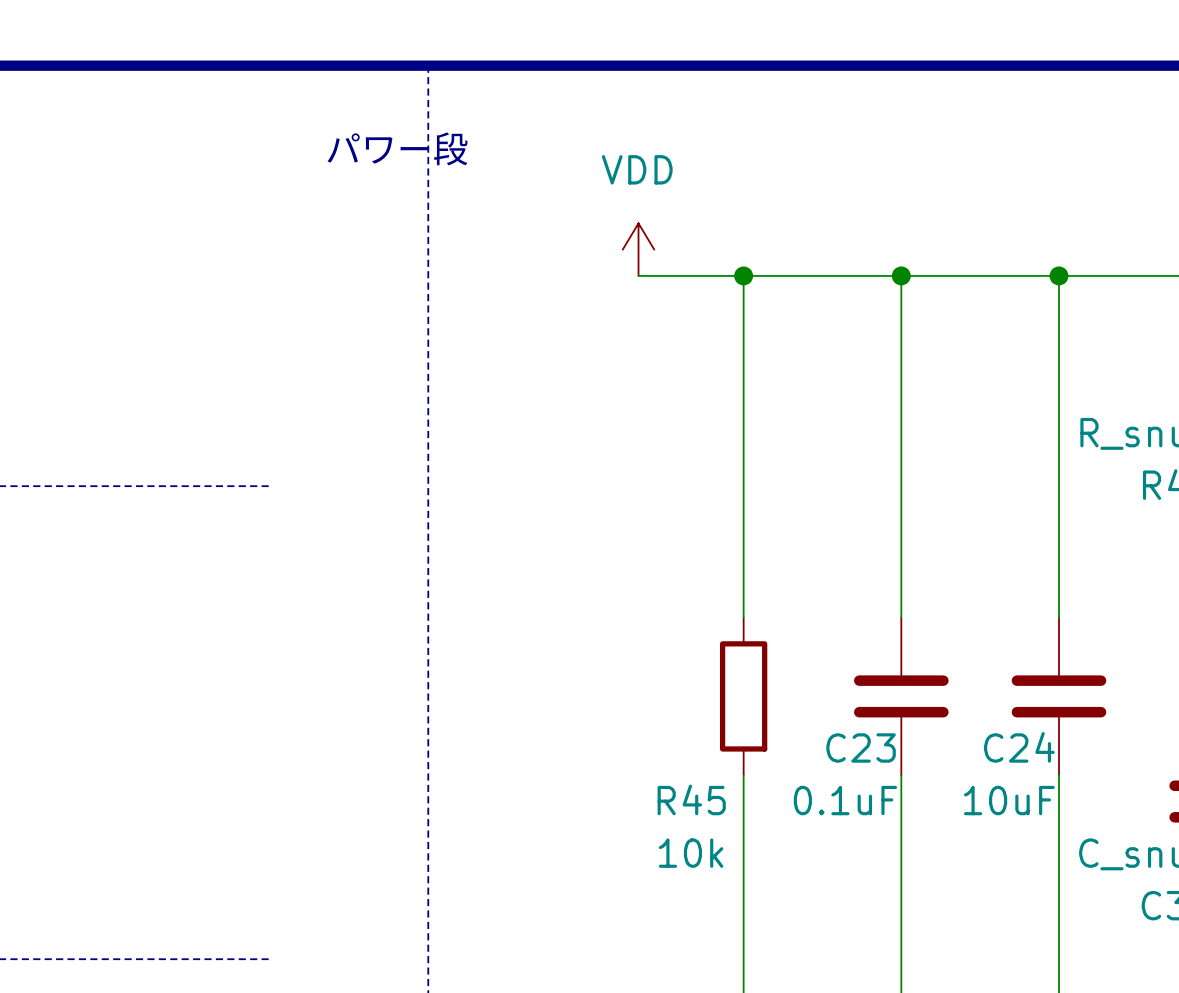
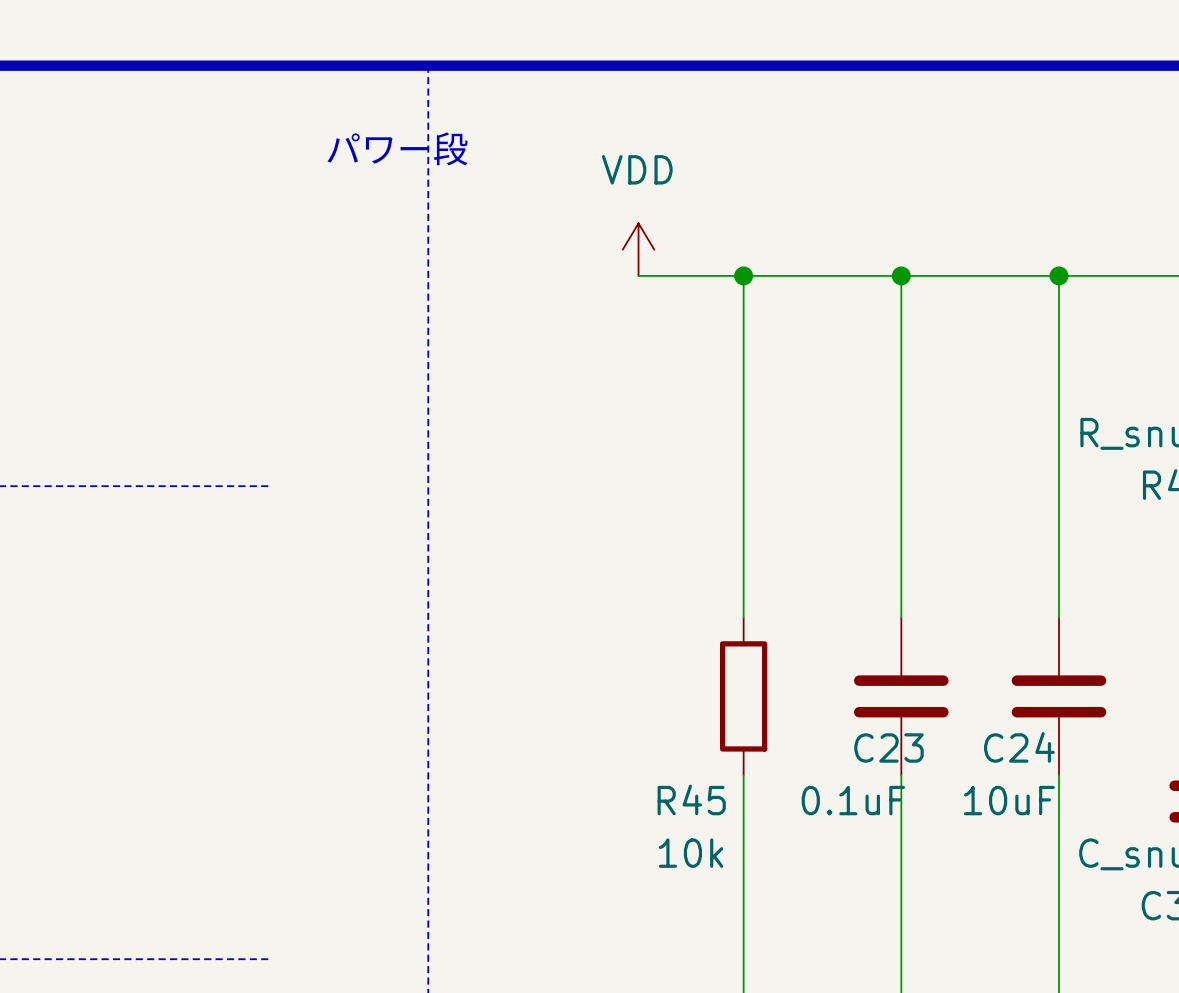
C23 name position: C23 (861, 747) -> C23 (889, 747)
C23 value position: 0.1uF (845, 800) -> 0.1uF (853, 800)

